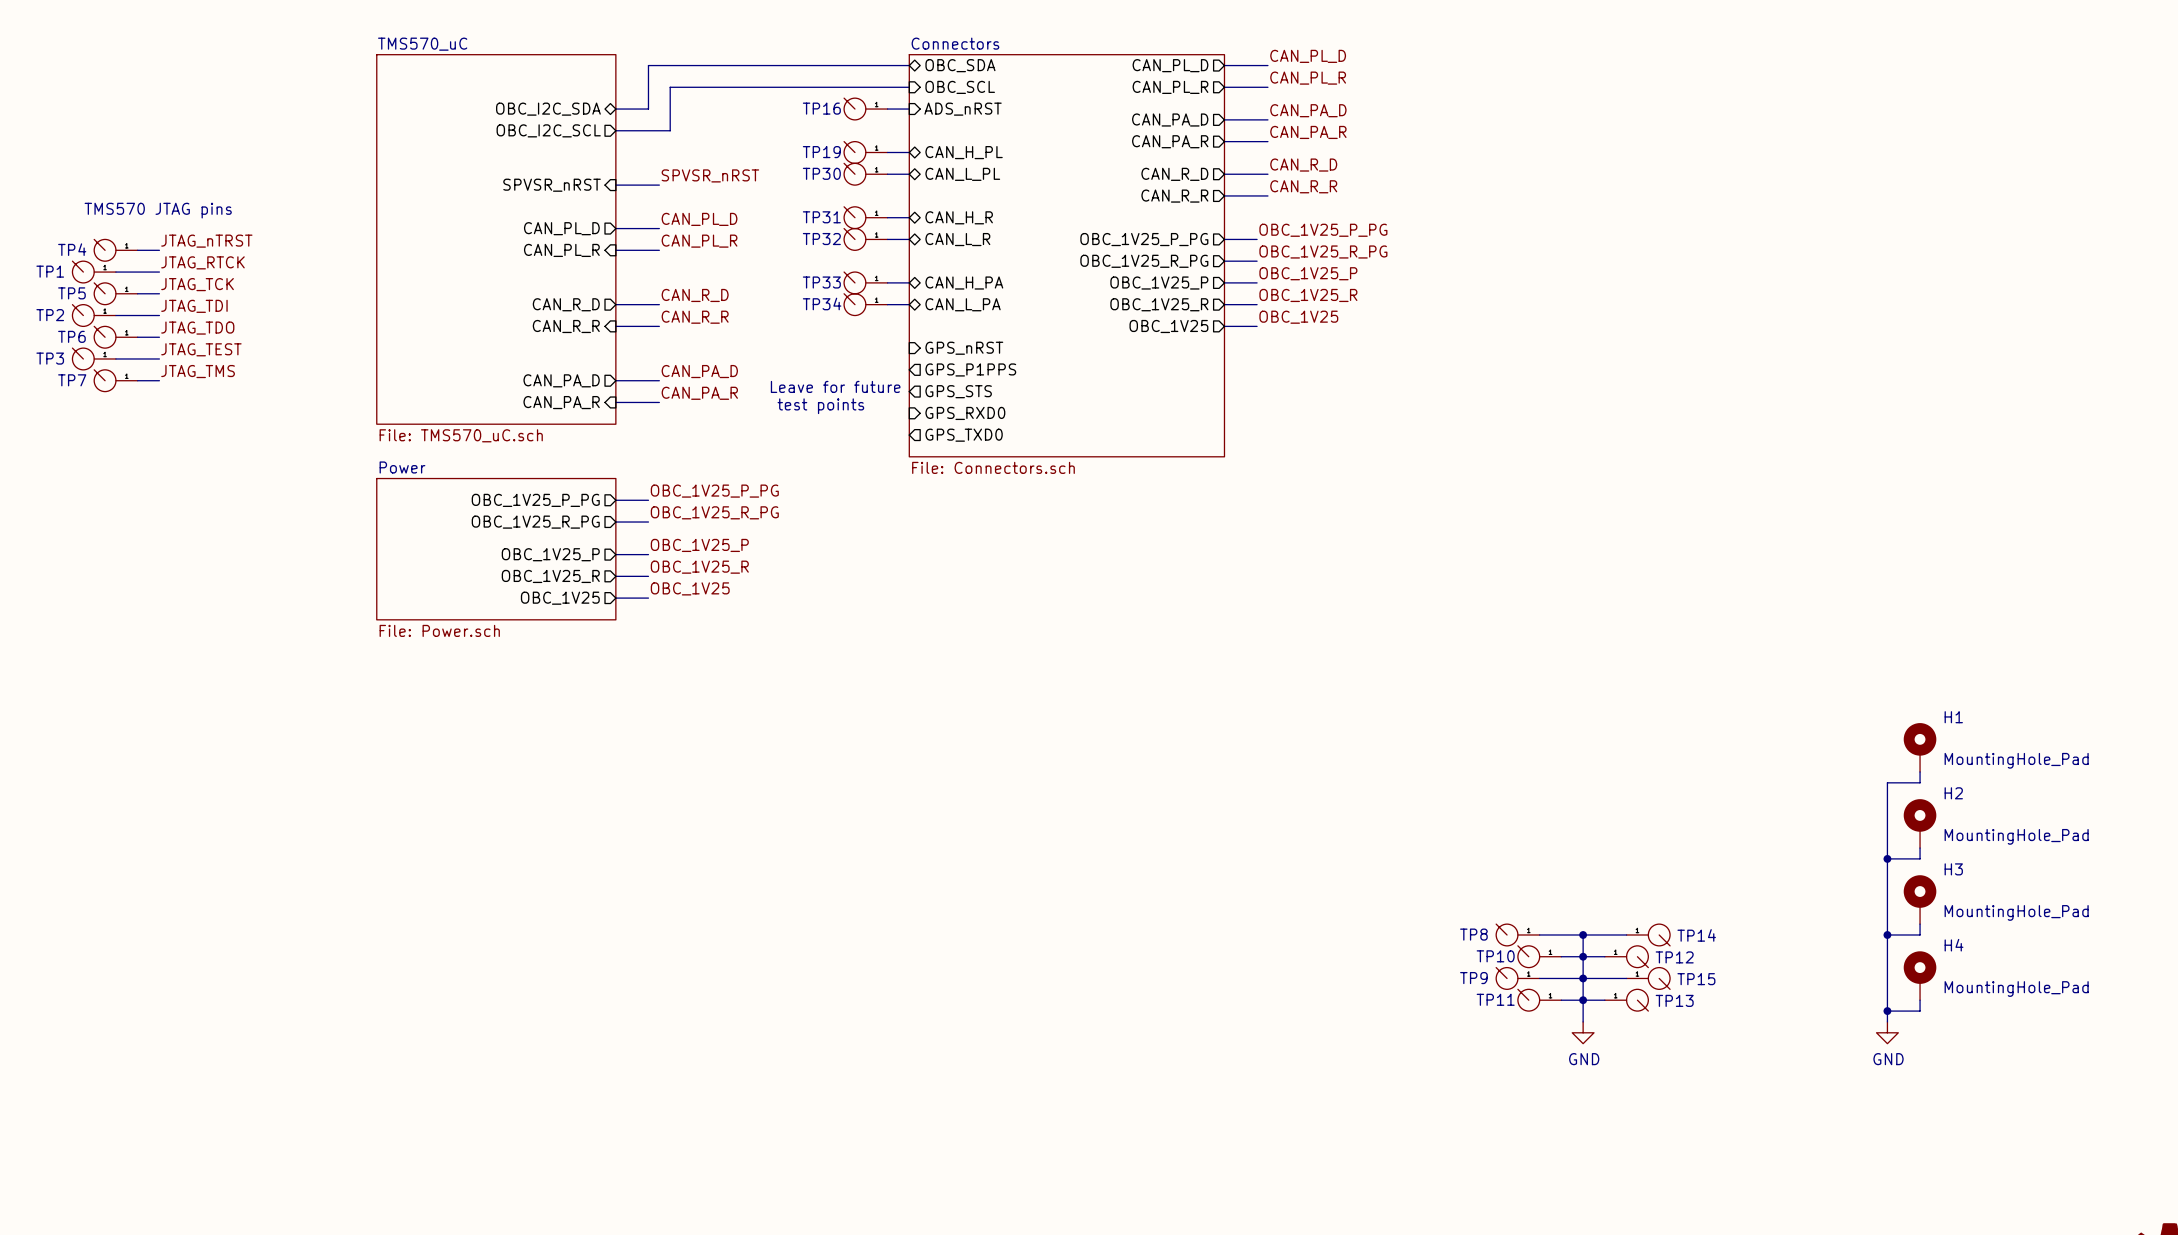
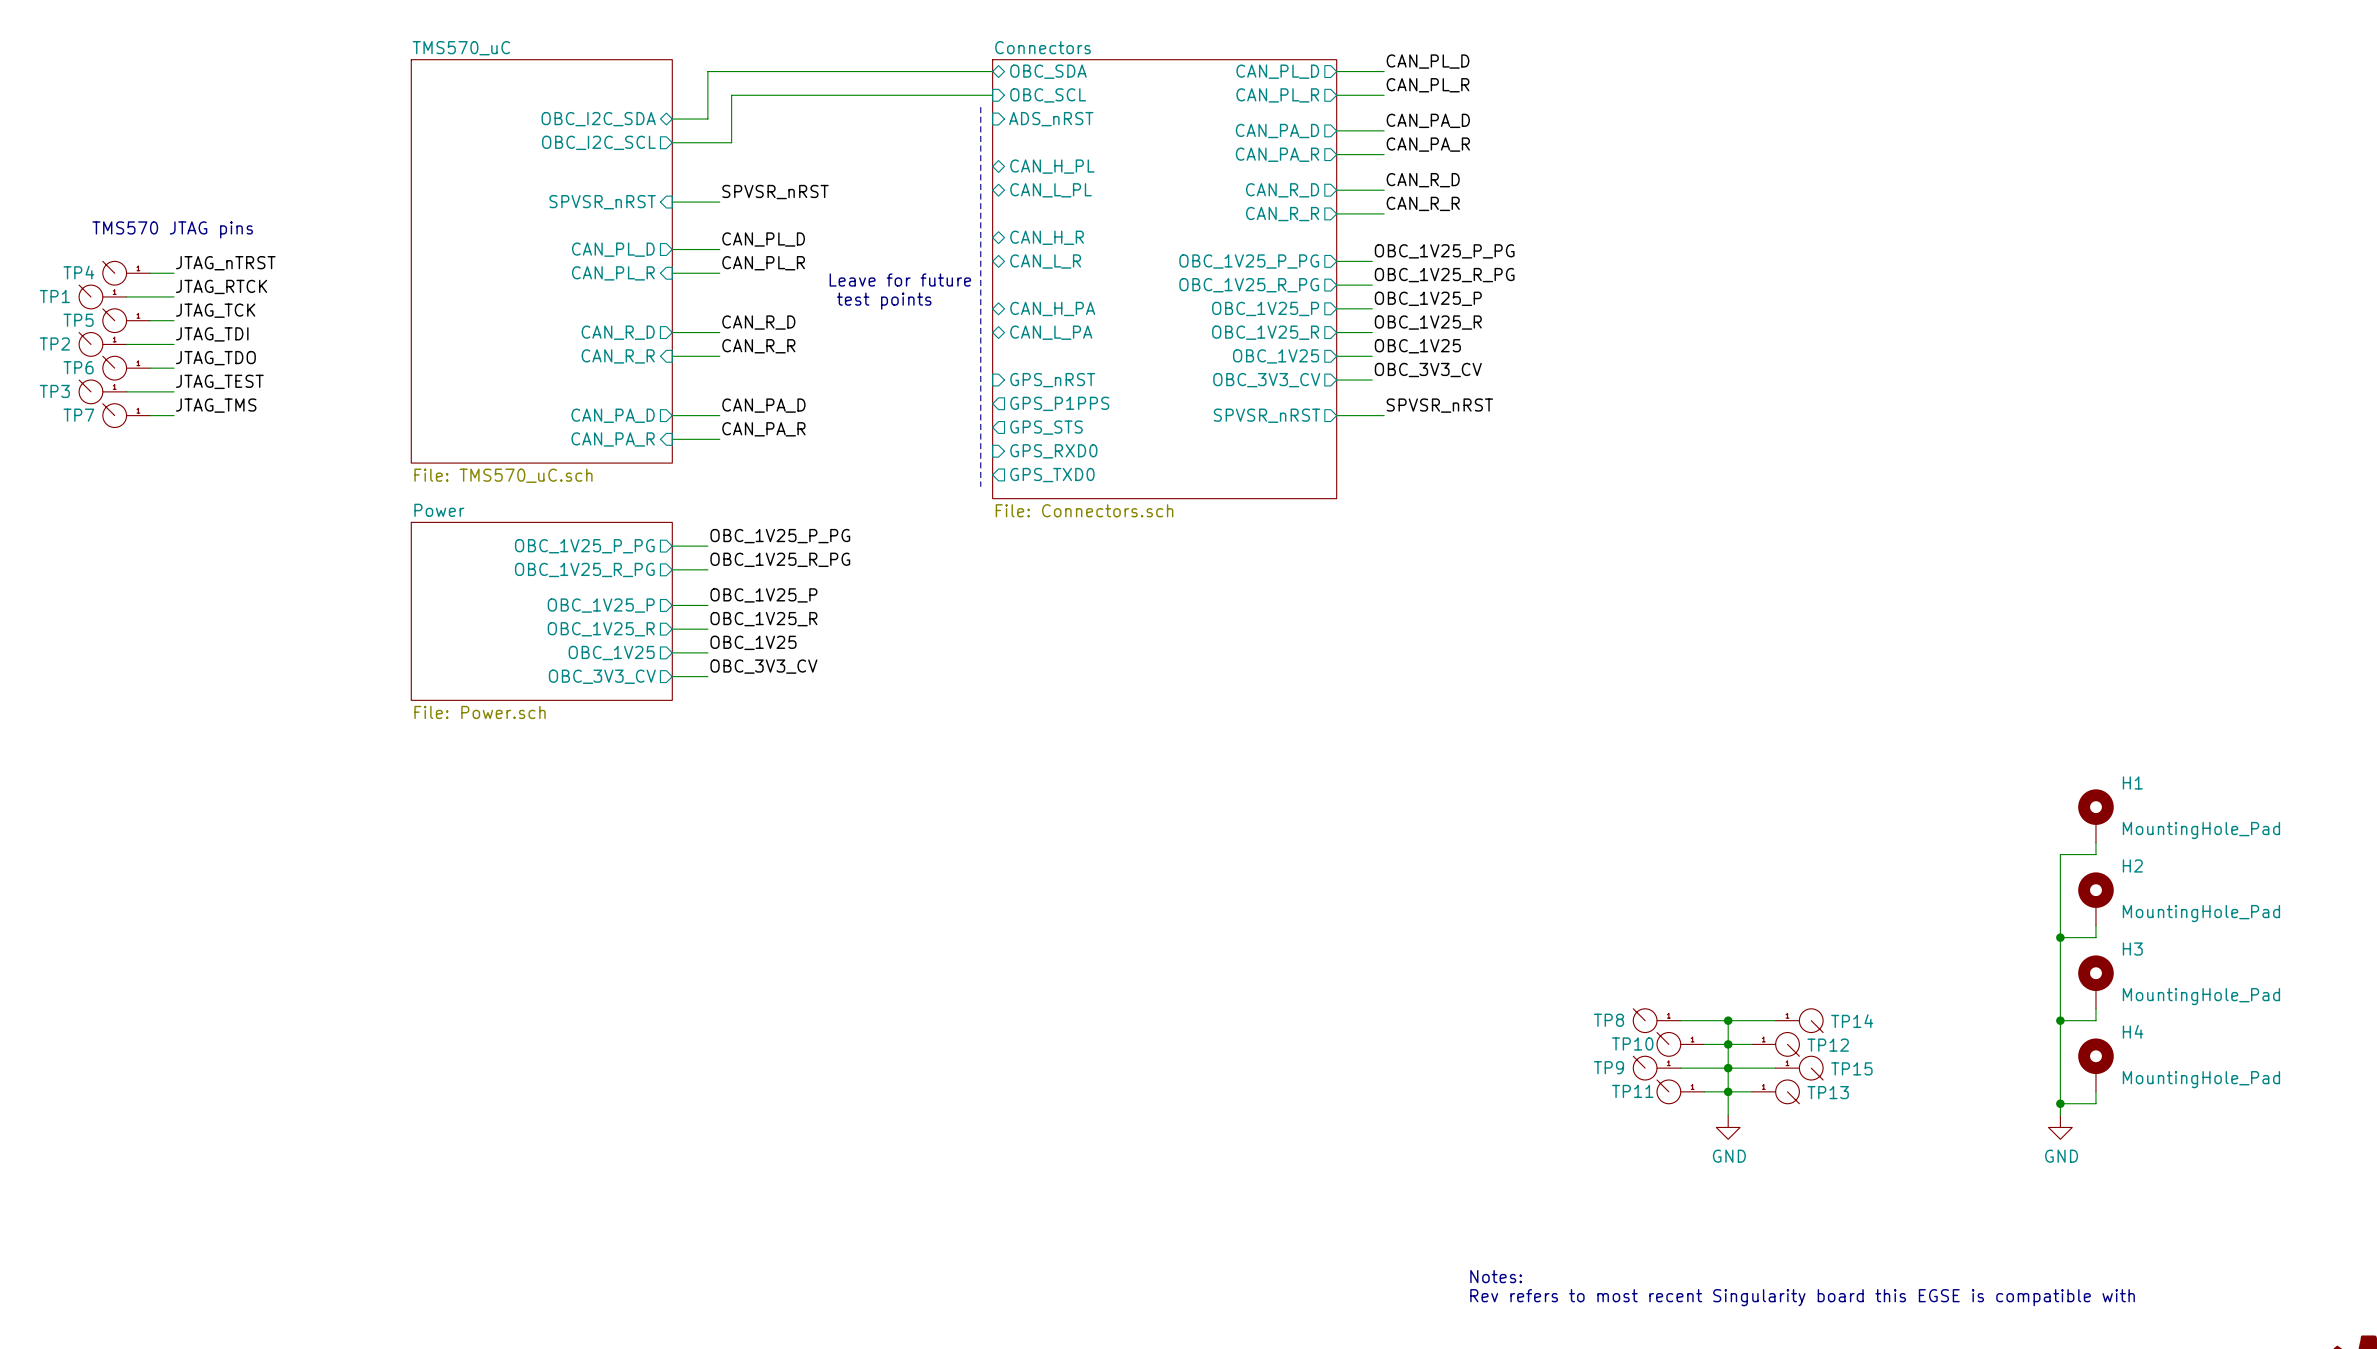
line: none -> (980, 107) (980, 486)
TP16: (865, 109) -> none
wire: (887, 109) (909, 109) -> none
TP19: (865, 152) -> none
wire: (887, 152) (909, 152) -> none
TP30: (865, 174) -> none
wire: (887, 174) (909, 174) -> none
TP31: (865, 217) -> none
wire: (887, 217) (909, 217) -> none
TP32: (865, 239) -> none
wire: (887, 239) (909, 239) -> none
TP33: (865, 282) -> none
wire: (887, 282) (909, 282) -> none
TP34: (865, 304) -> none
wire: (887, 304) (909, 304) -> none
label: none -> OBC_3V3_CV (1428, 370)
sheet pin: none -> OBC_3V3_CV (1266, 380)
wire: none -> (1336, 380) (1372, 380)
label: none -> SPVSR_nRST (1439, 405)
sheet pin: none -> SPVSR_nRST (1267, 415)
wire: none -> (1336, 415) (1384, 415)
text position: Leave for future (835, 386) -> Leave for future (900, 280)
text position: test points (820, 406) -> test points (884, 301)
sheet Power: File: Power.sch (496, 549) -> none
sheet Power: none -> File: Power.sch (541, 611)
label: none -> OBC_3V3_CV (763, 666)
sheet pin: none -> OBC_3V3_CV (602, 676)
wire: none -> (672, 676) (707, 676)
text: none -> Notes: (1496, 1276)
text: none -> Rev refers to most recent Singularity board this EGSE is compatible with (1802, 1297)

